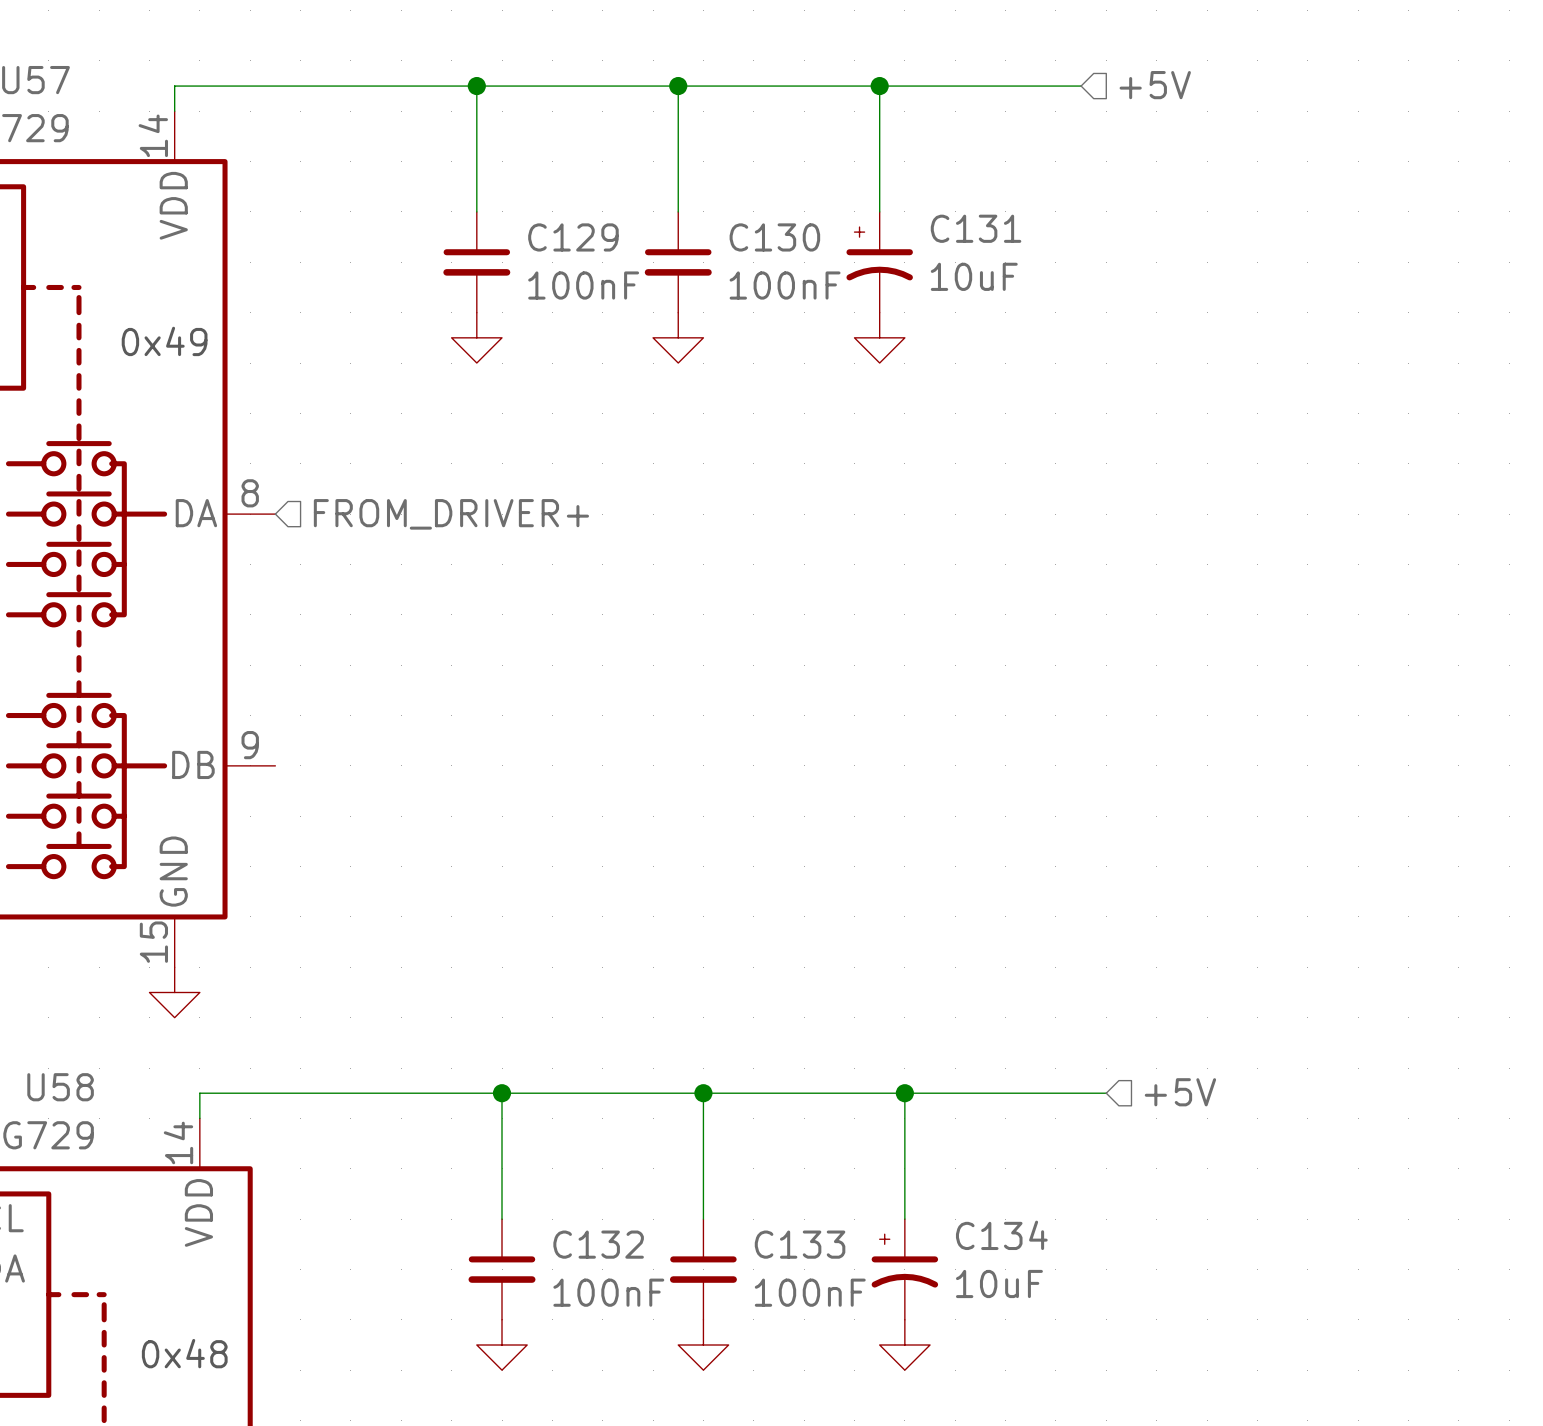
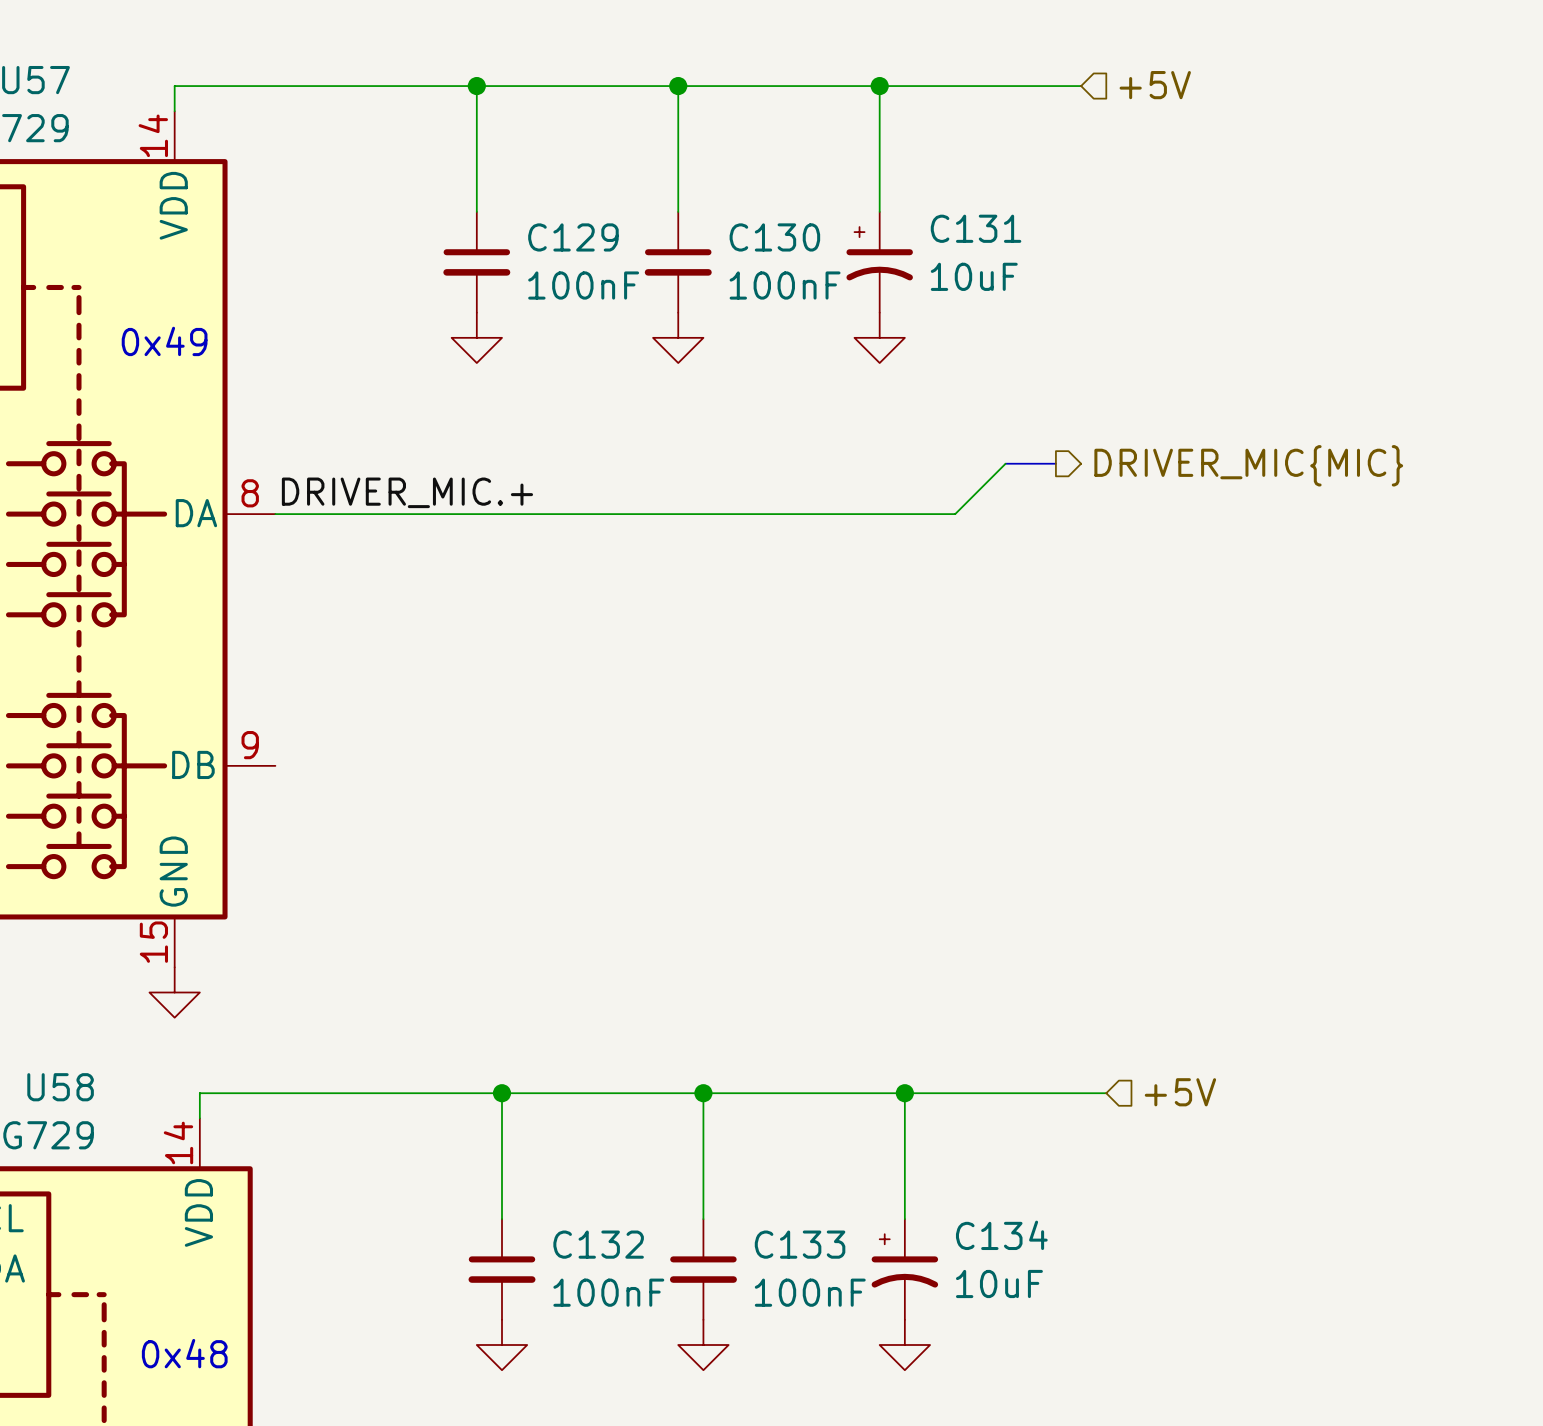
wire: none -> (1005, 463) (955, 514) (275, 514)
bus: none -> (1005, 463) (1055, 463)
hierarchical label: none -> DRIVER_MIC{MIC} (1248, 465)
label: none -> DRIVER_MIC.+ (407, 492)
hierarchical label: FROM_DRIVER+ (451, 514) -> none

